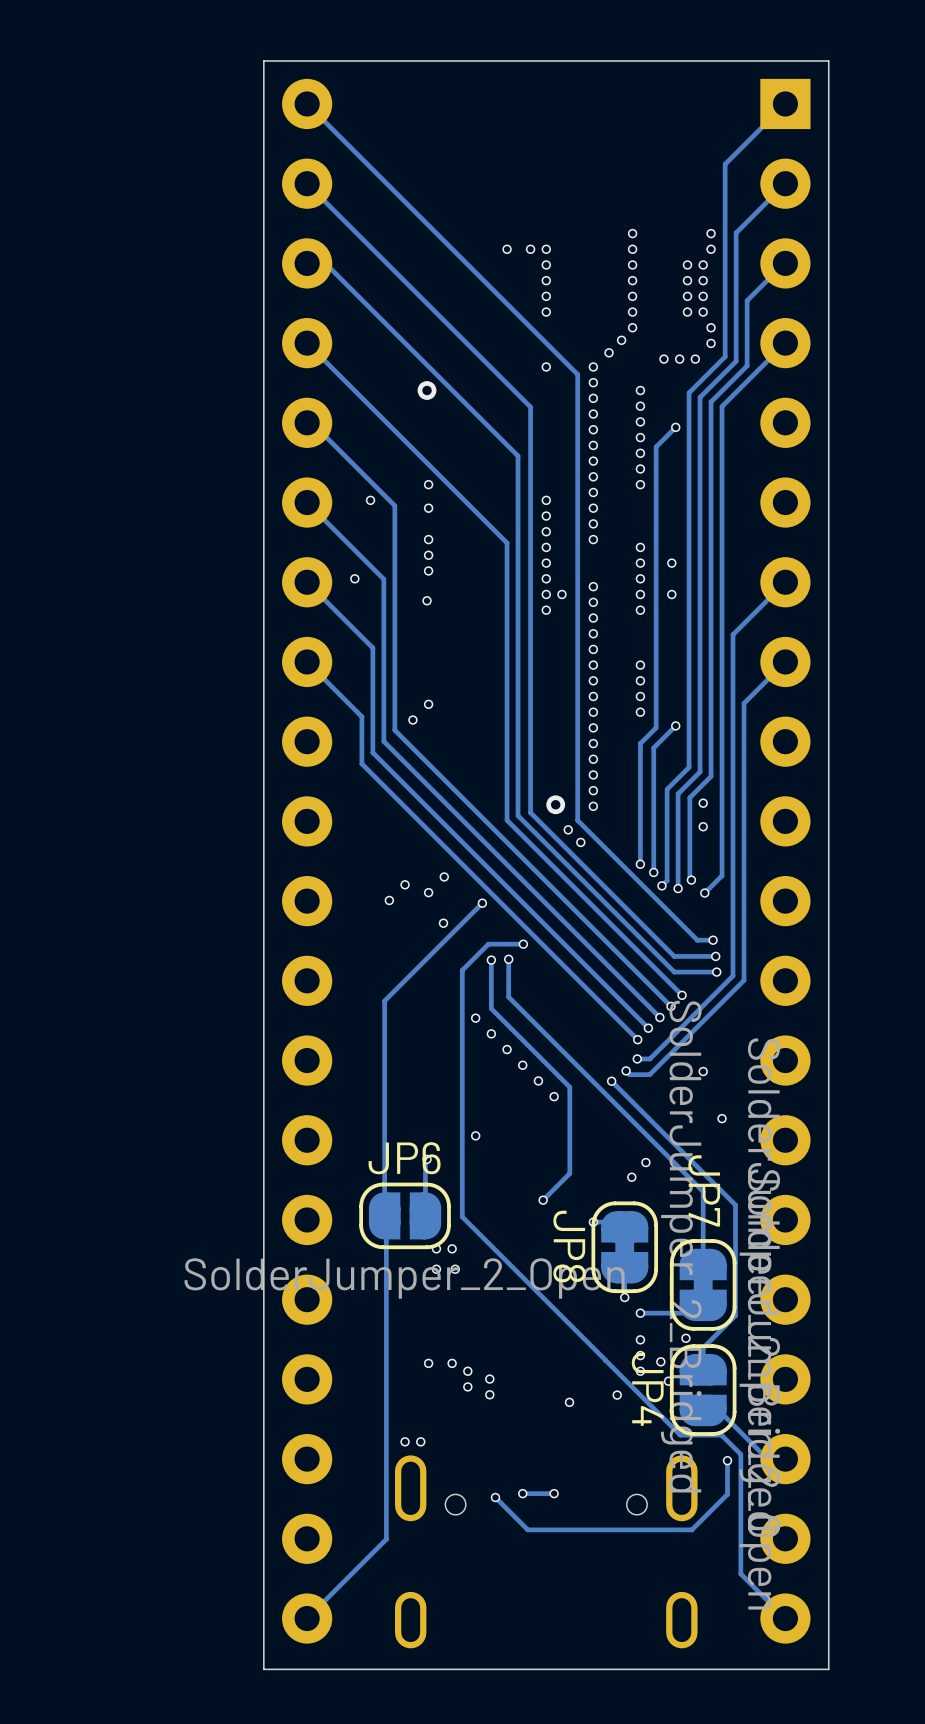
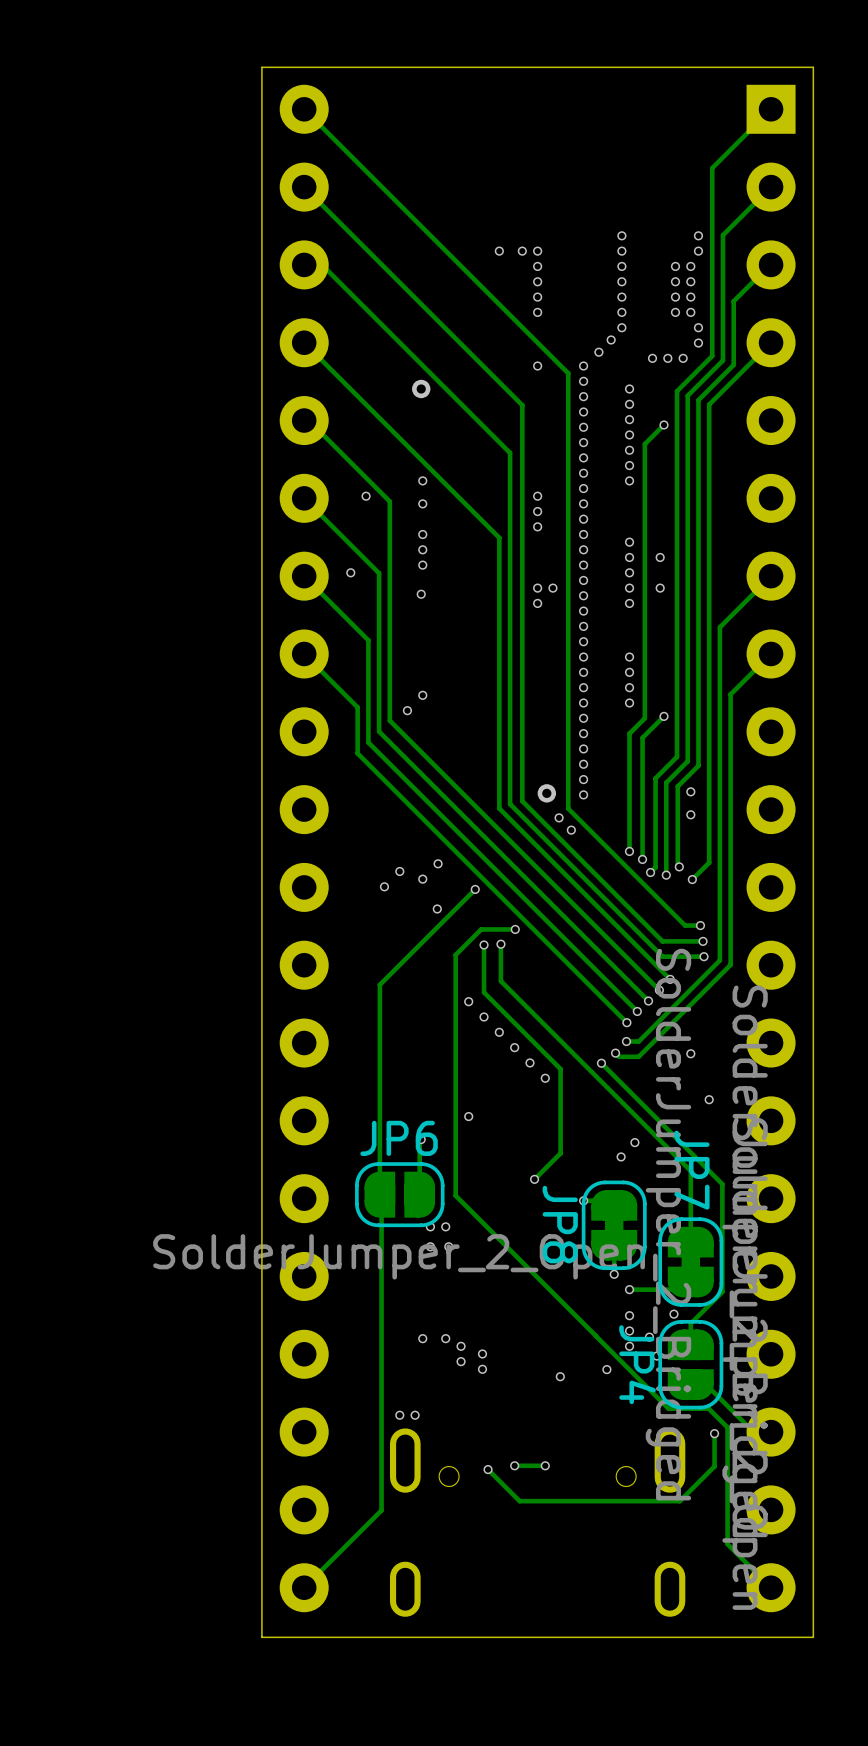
via: (546, 547) -> none
via: none -> (583, 549)
via: (546, 563) -> none
via: none -> (583, 565)
via: (546, 578) -> none

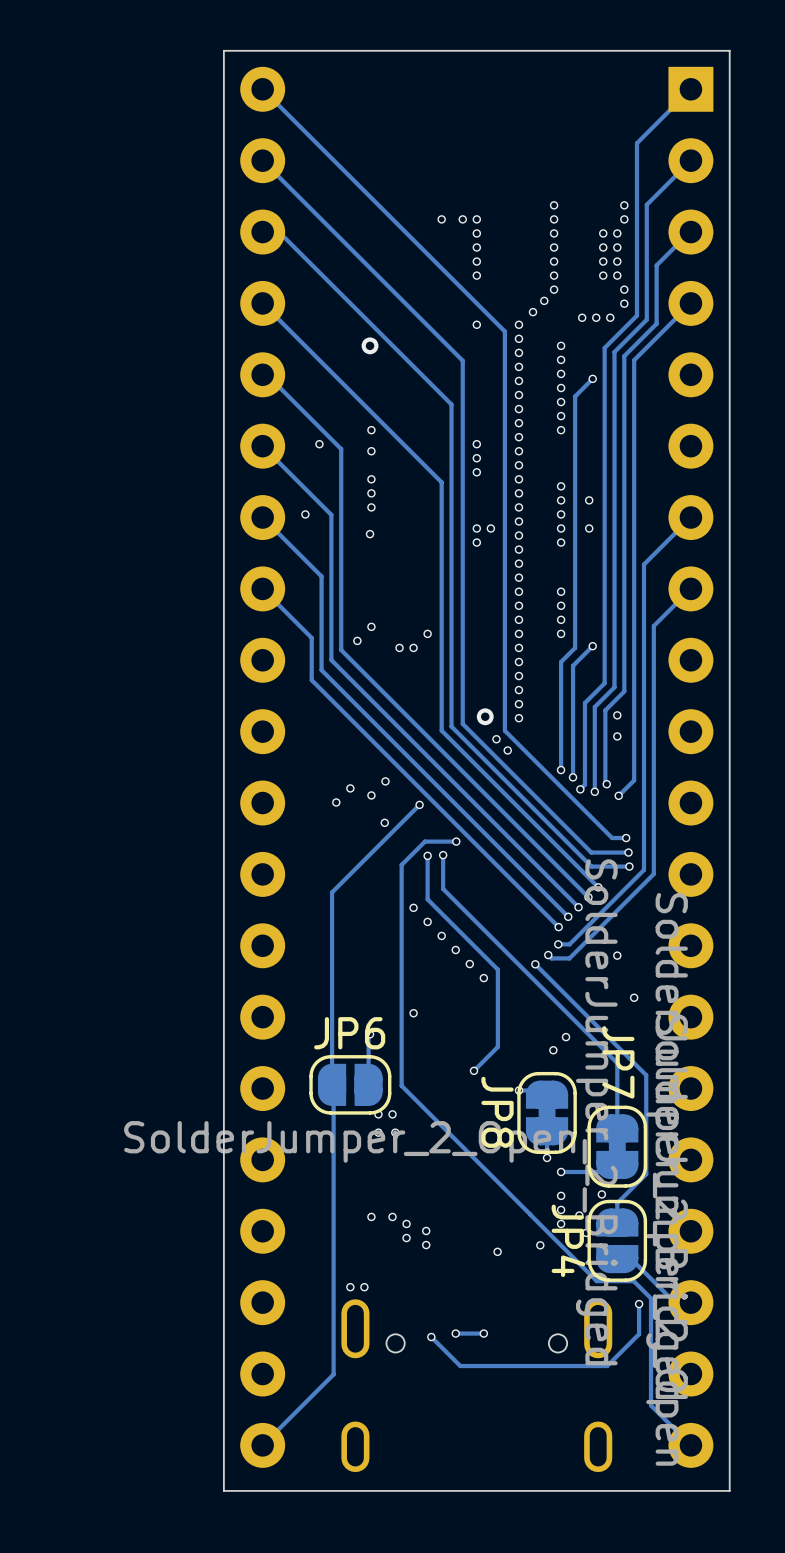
via: none -> (427, 633)
via: none -> (399, 647)
via: none -> (413, 647)

